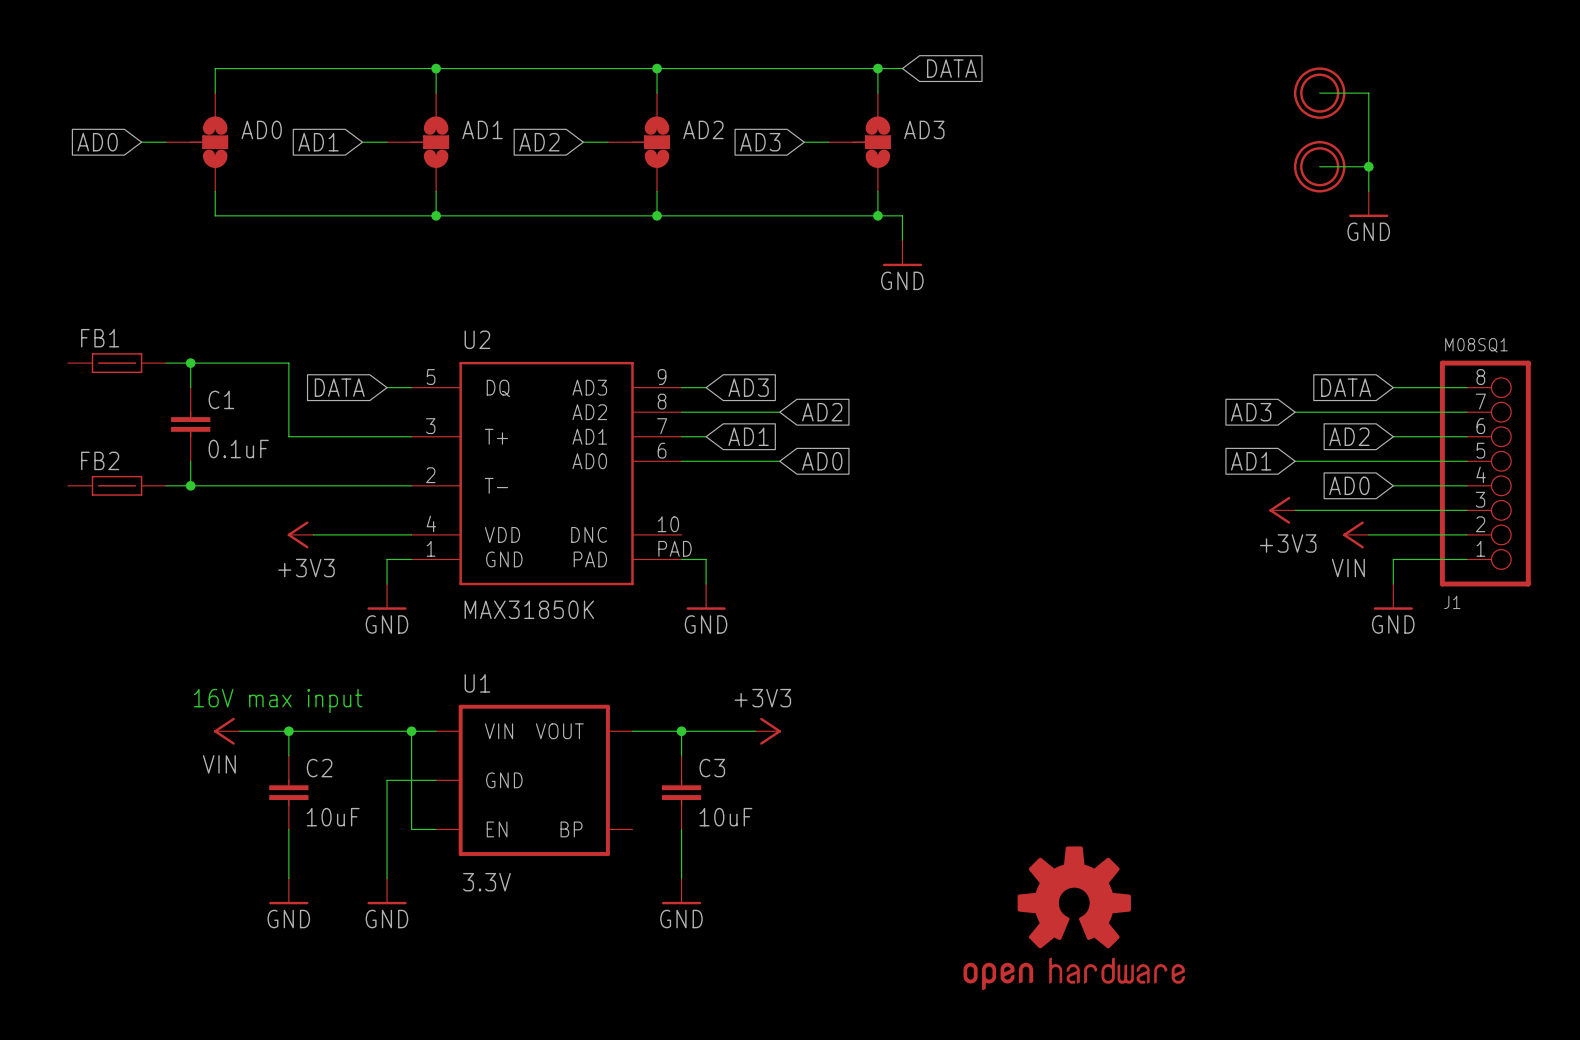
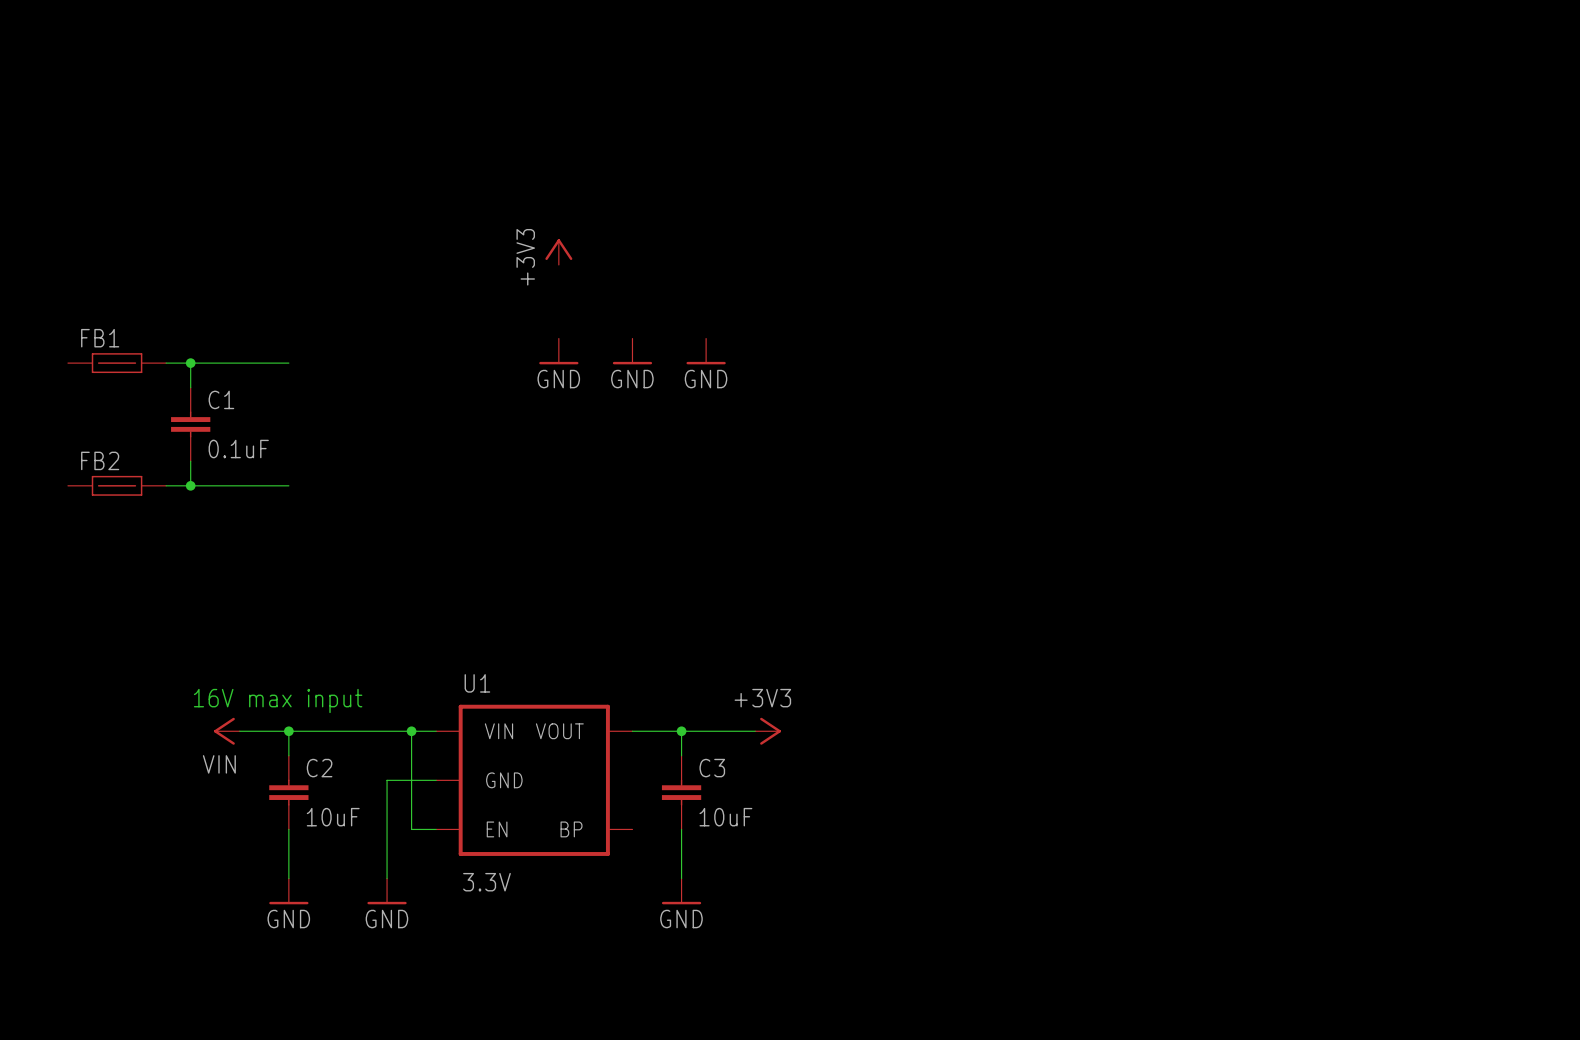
wire: (436, 68) (436, 93) -> none
junction: (436, 68) -> none
wire: (657, 68) (657, 93) -> none
junction: (657, 68) -> none
wire: (877, 68) (877, 93) -> none
junction: (877, 68) -> none
wire: (902, 68) (215, 68) (215, 93) -> none
global label: DATA (951, 68) -> none
wire: (1319, 93) (1368, 93) (1368, 191) -> none
part: (1319, 93) -> none
global label: AD0 (97, 142) -> none
wire: (141, 142) (166, 142) -> none
AD0: (197, 142) -> none
global label: AD1 (318, 142) -> none
wire: (362, 142) (387, 142) -> none
AD1: (418, 142) -> none
global label: AD2 (539, 142) -> none
wire: (583, 142) (607, 142) -> none
AD2: (638, 142) -> none
global label: AD3 (760, 142) -> none
wire: (804, 142) (828, 142) -> none
AD3: (859, 142) -> none
wire: (1319, 166) (1368, 166) -> none
part: (1319, 166) -> none
junction: (1368, 166) -> none
wire: (215, 191) (215, 215) (902, 215) (902, 240) -> none
wire: (436, 191) (436, 215) -> none
wire: (657, 191) (657, 215) -> none
wire: (877, 191) (877, 215) -> none
power symbol: GND (1368, 204) -> none
junction: (436, 215) -> none
junction: (657, 215) -> none
junction: (877, 215) -> none
power symbol: none -> +3V3 (558, 252)
power symbol: GND (902, 253) -> none
power symbol: none -> GND (558, 351)
power symbol: none -> GND (632, 351)
power symbol: none -> GND (706, 351)
wire: (288, 363) (288, 436) (411, 436) -> none
global label: DATA (339, 387) -> none
wire: (387, 387) (411, 387) -> none
wire: (681, 387) (706, 387) -> none
global label: AD3 (748, 387) -> none
global label: DATA (1346, 387) -> none
wire: (1393, 387) (1466, 387) -> none
wire: (681, 412) (779, 412) -> none
global label: AD2 (822, 412) -> none
global label: AD3 (1251, 412) -> none
wire: (1295, 412) (1466, 412) -> none
wire: (681, 436) (706, 436) -> none
global label: AD1 (748, 436) -> none
global label: AD2 (1349, 436) -> none
wire: (1393, 436) (1466, 436) -> none
wire: (681, 461) (779, 461) -> none
global label: AD0 (822, 461) -> none
global label: AD1 (1251, 461) -> none
wire: (1295, 461) (1466, 461) -> none
U2: MAX31850K (546, 473) -> none
J1: M08SQ1 (1485, 473) -> none
wire: (288, 485) (411, 485) -> none
global label: AD0 (1349, 485) -> none
wire: (1393, 485) (1466, 485) -> none
power symbol: +3V3 (1282, 510) -> none
wire: (1295, 510) (1466, 510) -> none
power symbol: +3V3 (300, 534) -> none
wire: (313, 534) (411, 534) -> none
power symbol: VIN (1355, 534) -> none
wire: (1368, 534) (1466, 534) -> none
wire: (411, 559) (387, 559) (387, 584) -> none
wire: (681, 559) (706, 559) (706, 584) -> none
wire: (1466, 559) (1393, 559) (1393, 584) -> none
power symbol: GND (387, 596) -> none
power symbol: GND (706, 596) -> none
power symbol: GND (1393, 596) -> none
part: (1074, 918) -> none

